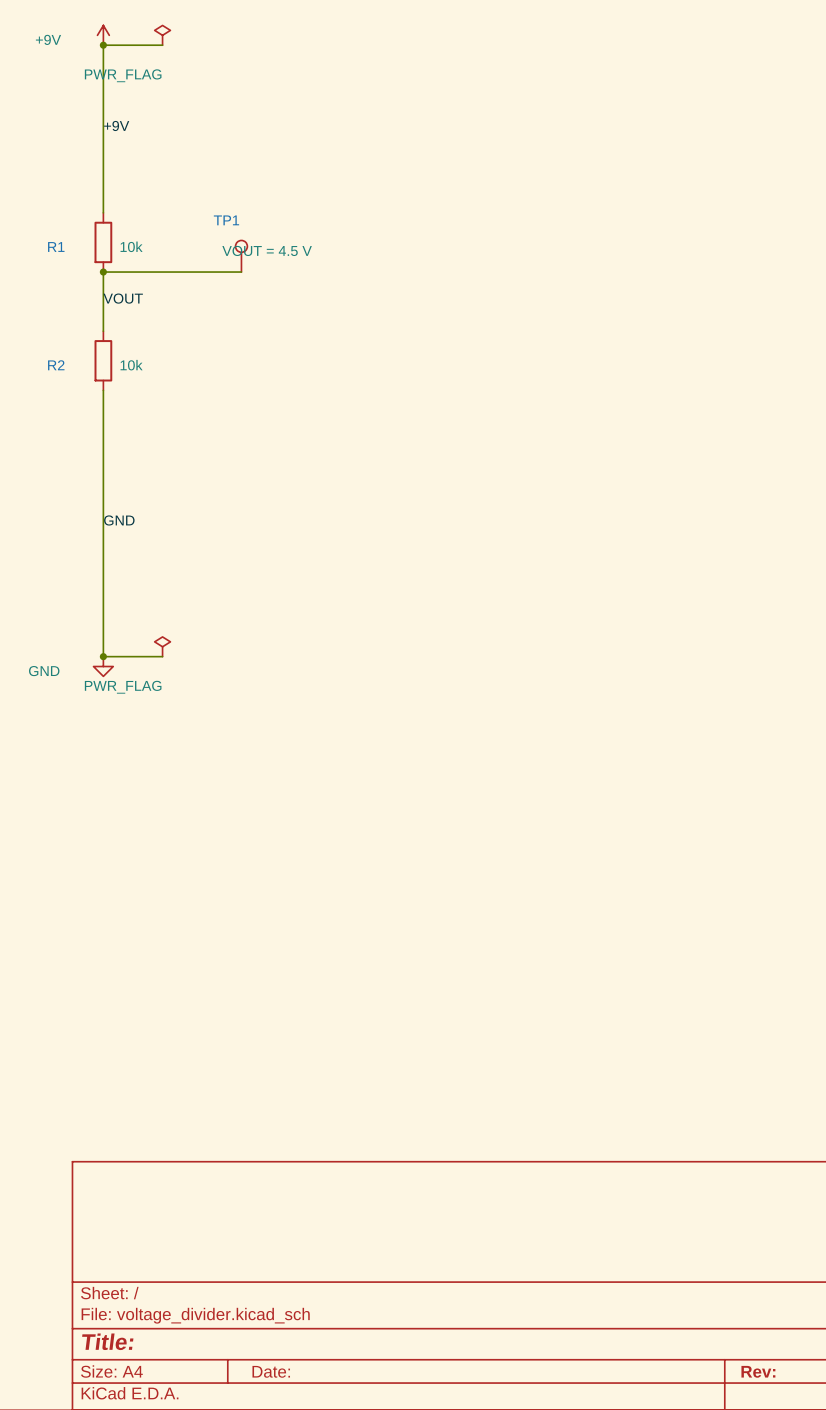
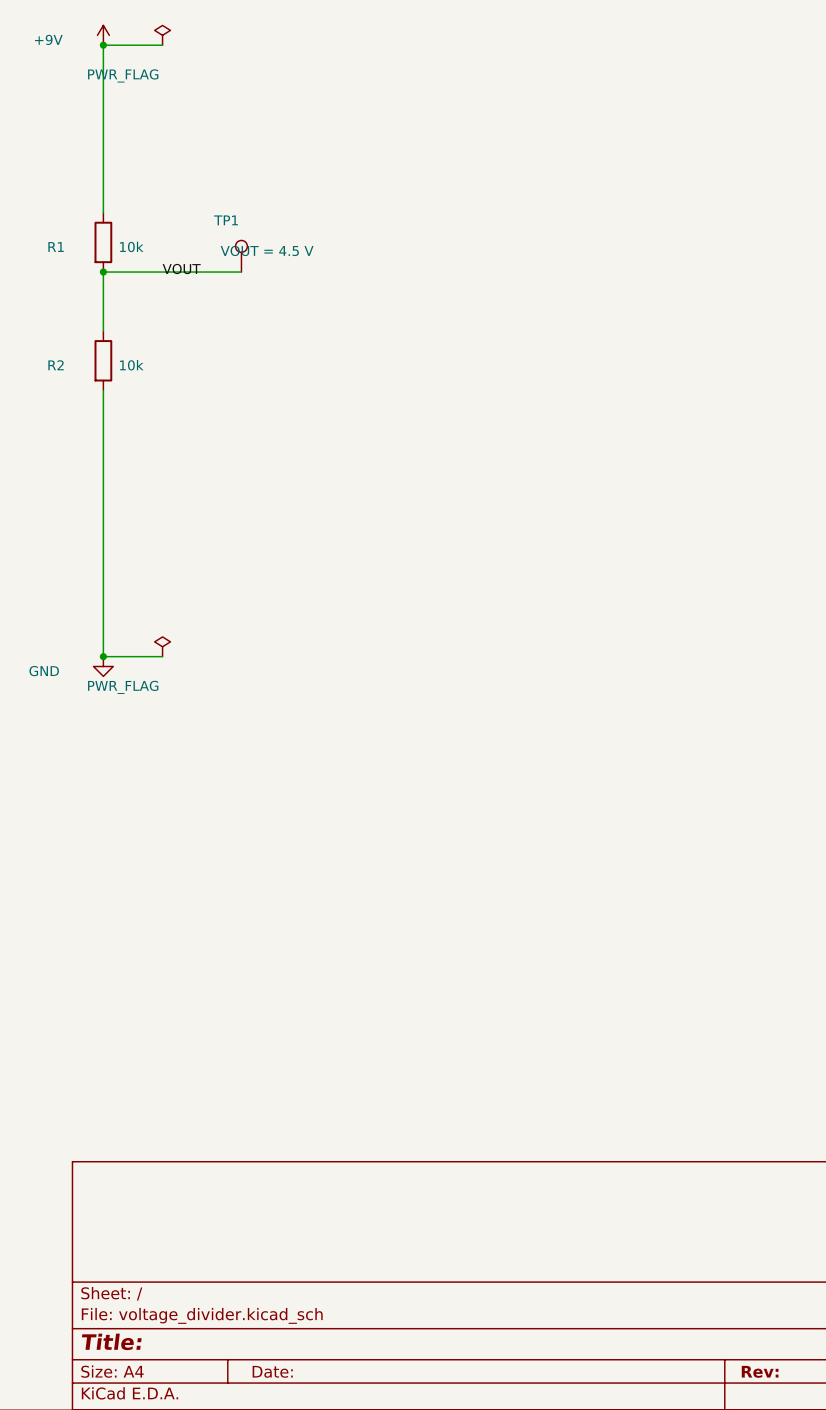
label: +9V (116, 125) -> none
label position: VOUT (123, 298) -> VOUT (181, 269)
label: GND (119, 520) -> none

